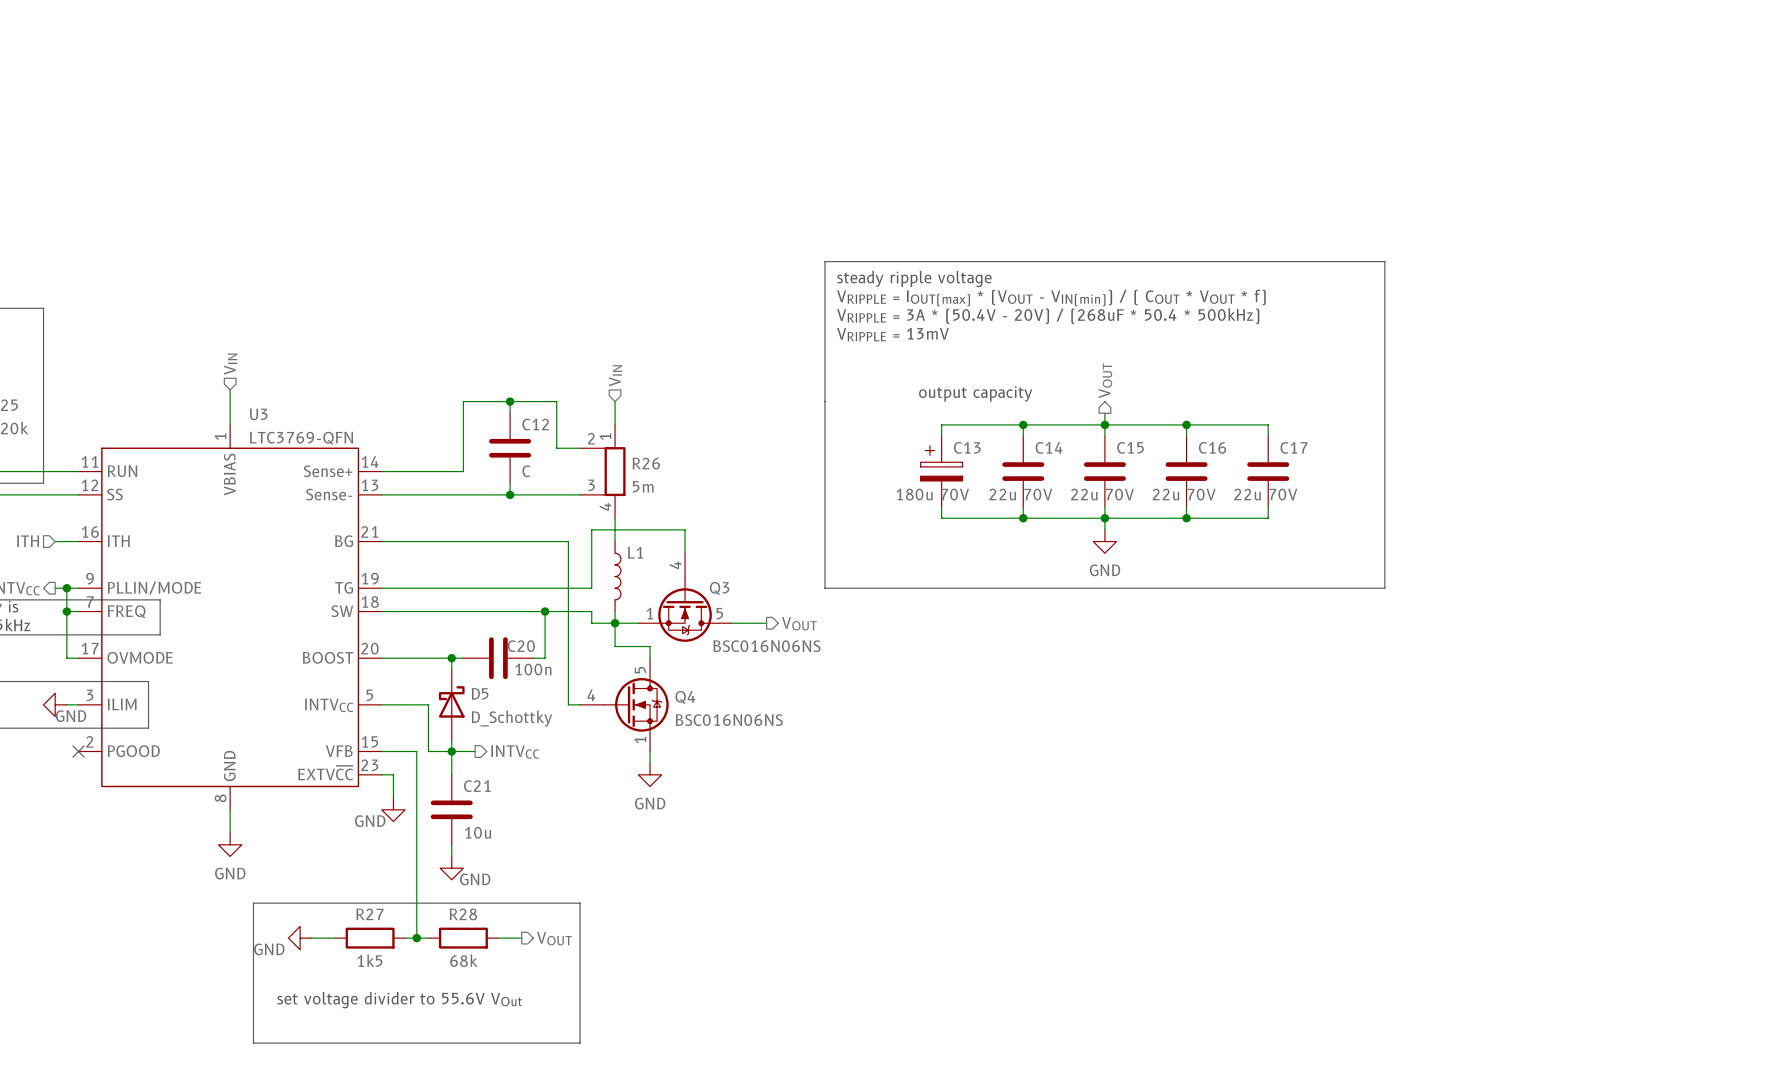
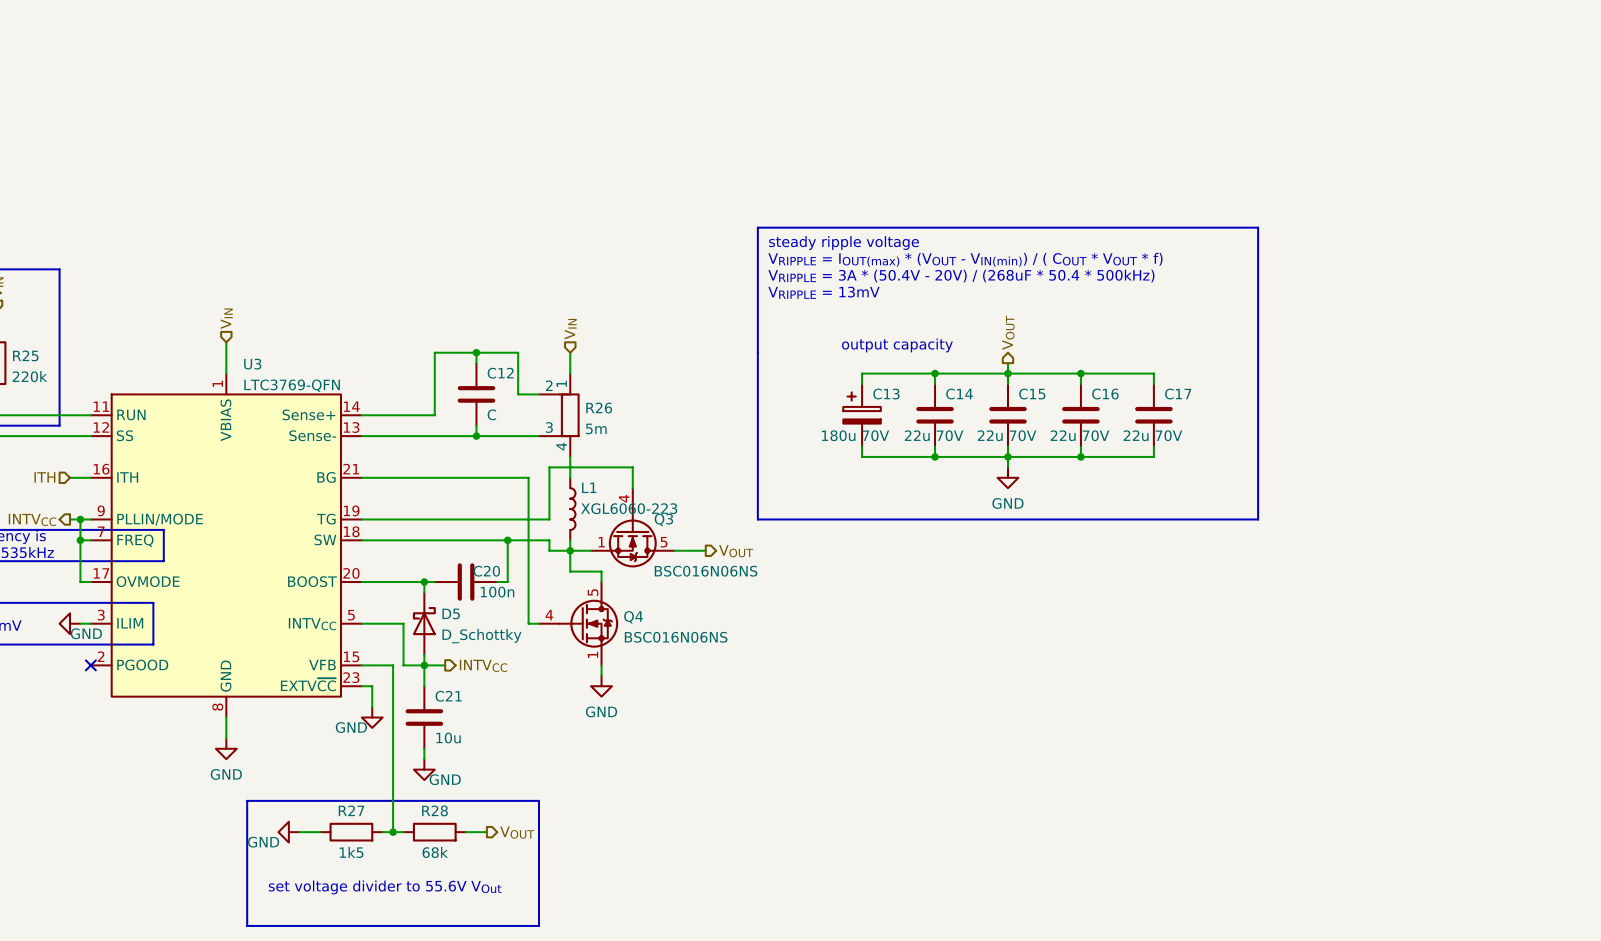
L1 value: none -> XGL6060-223 (629, 508)

